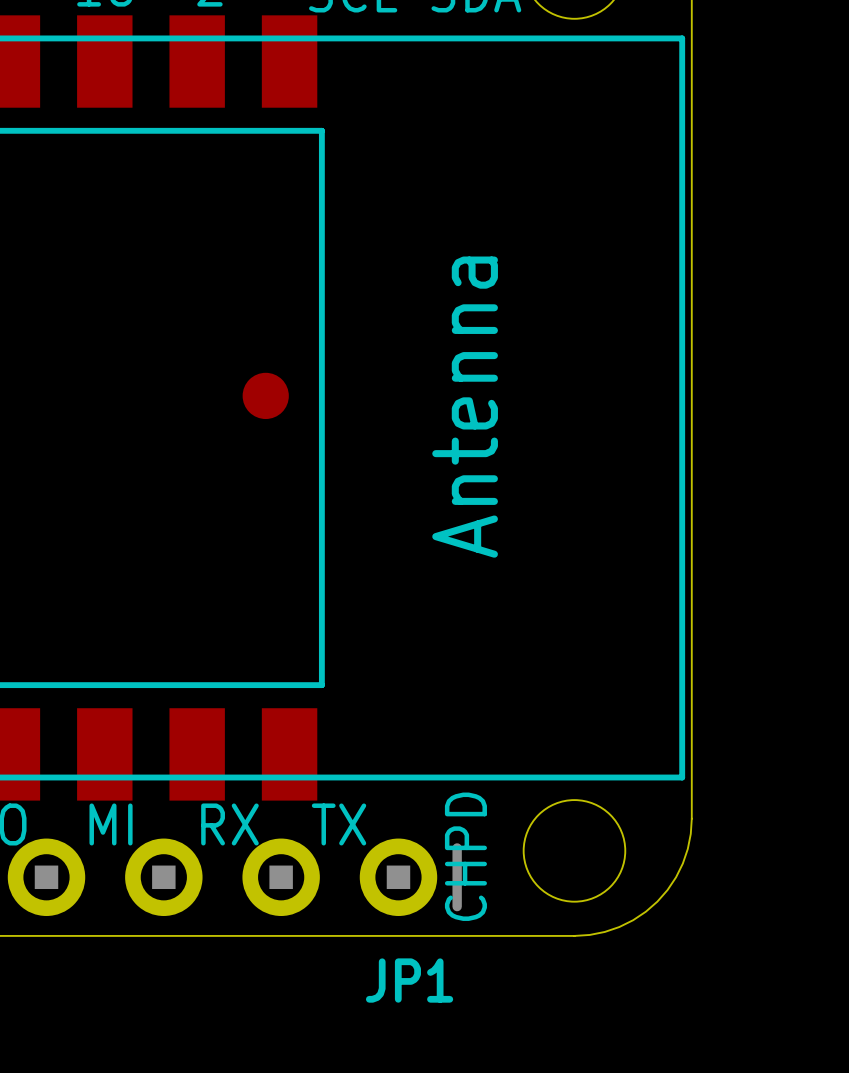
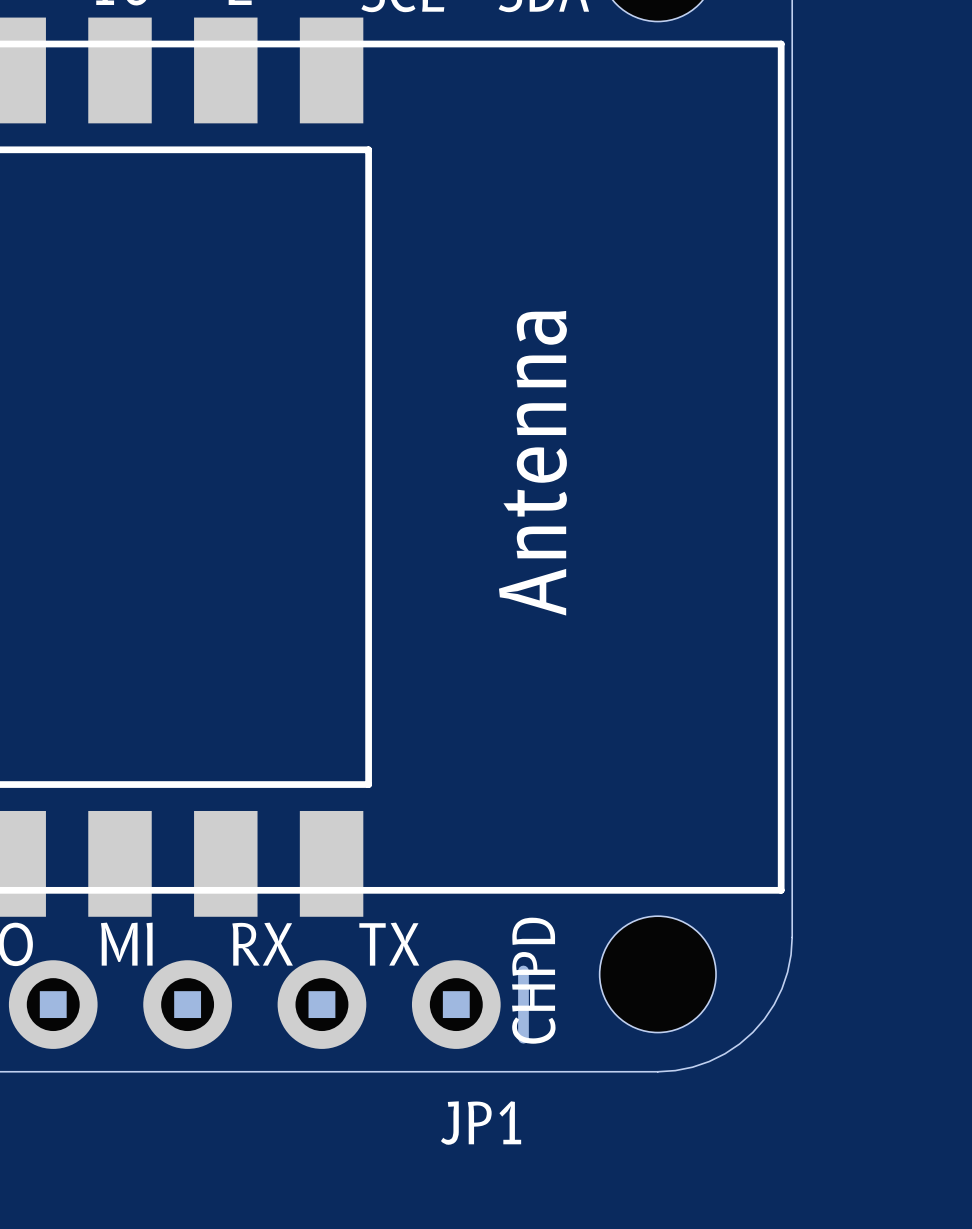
part: (265, 395) -> none

